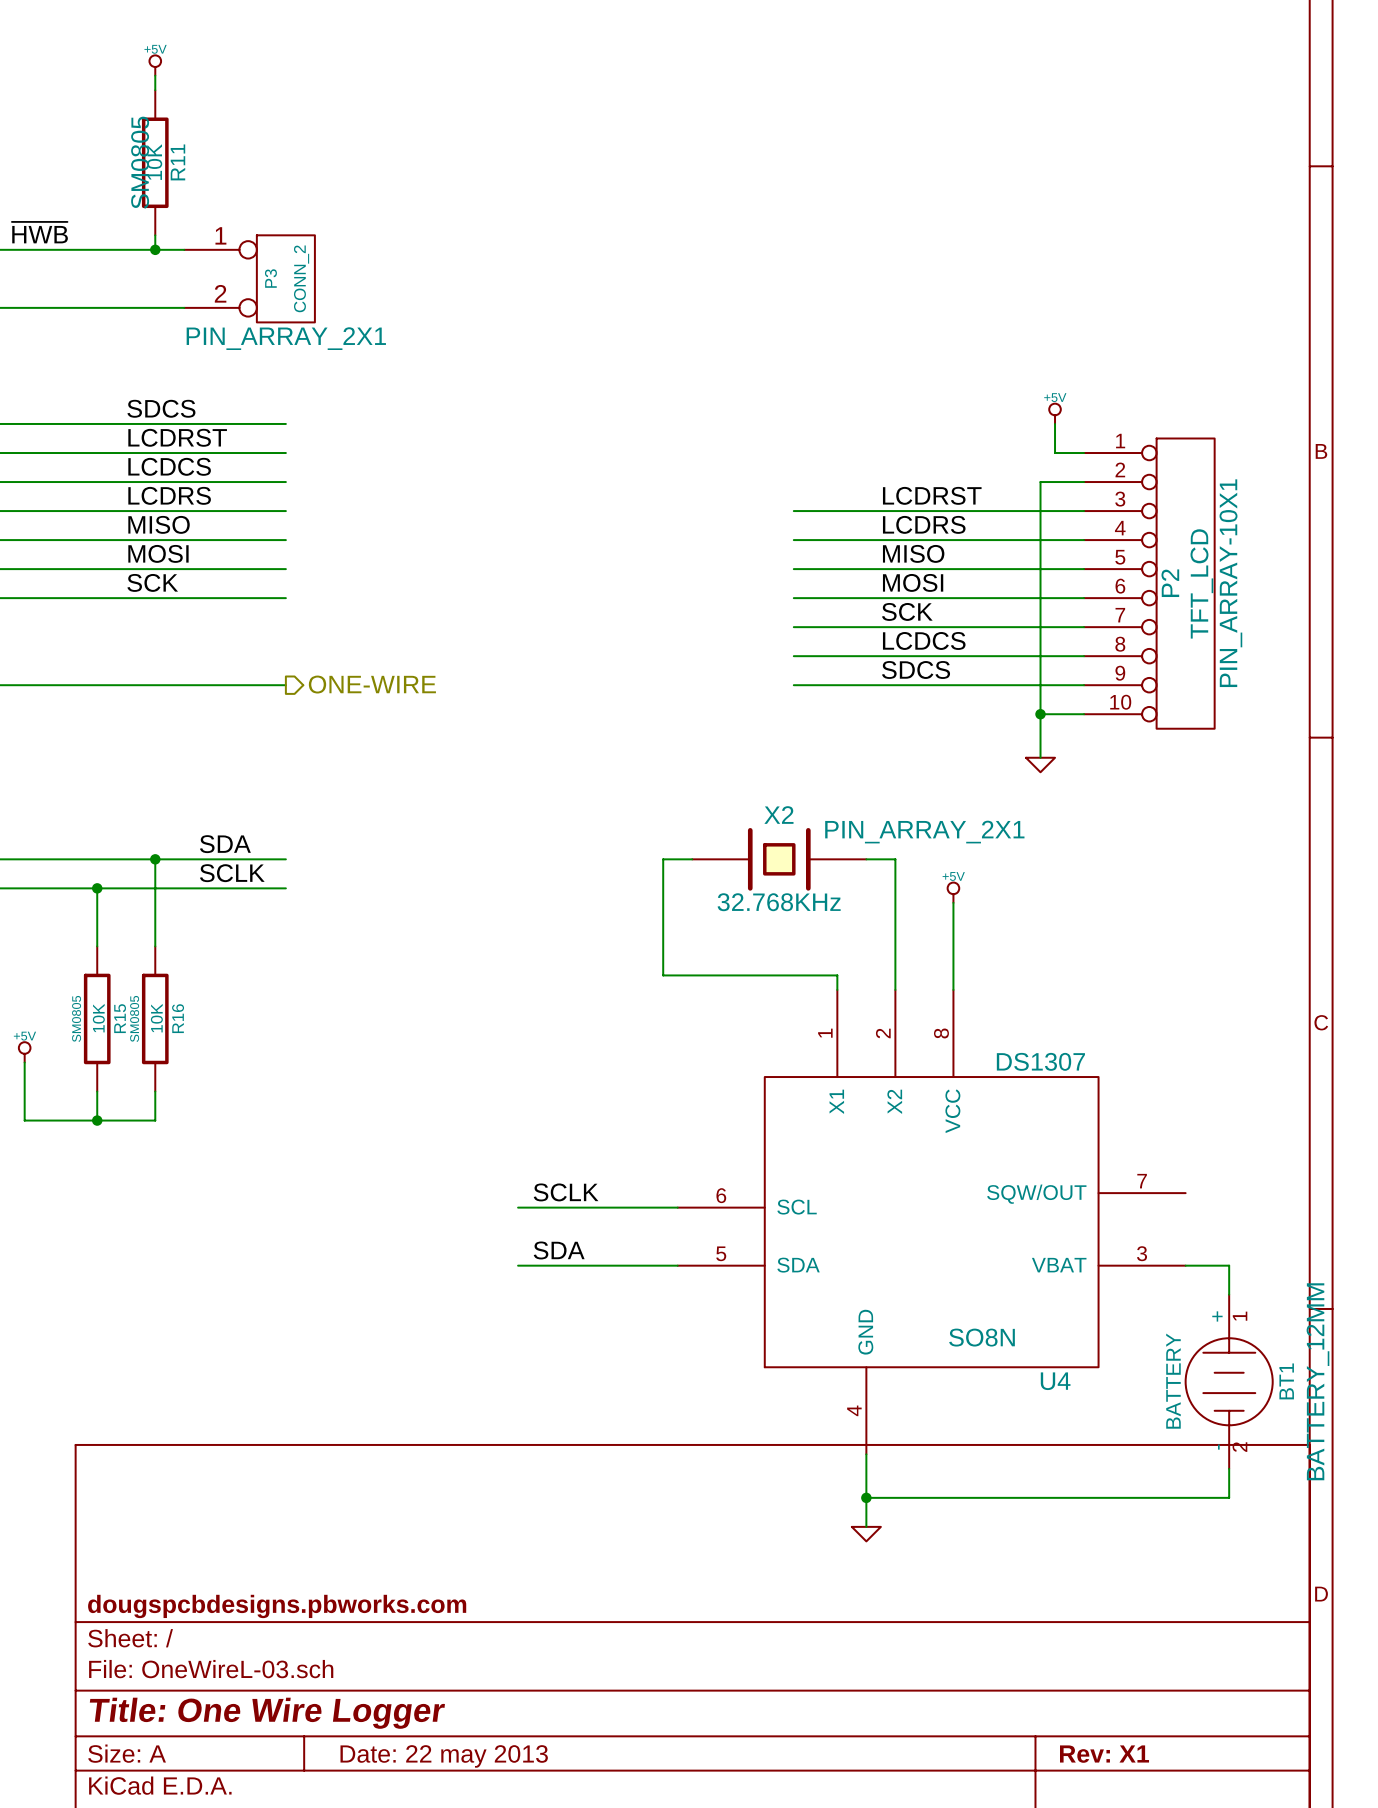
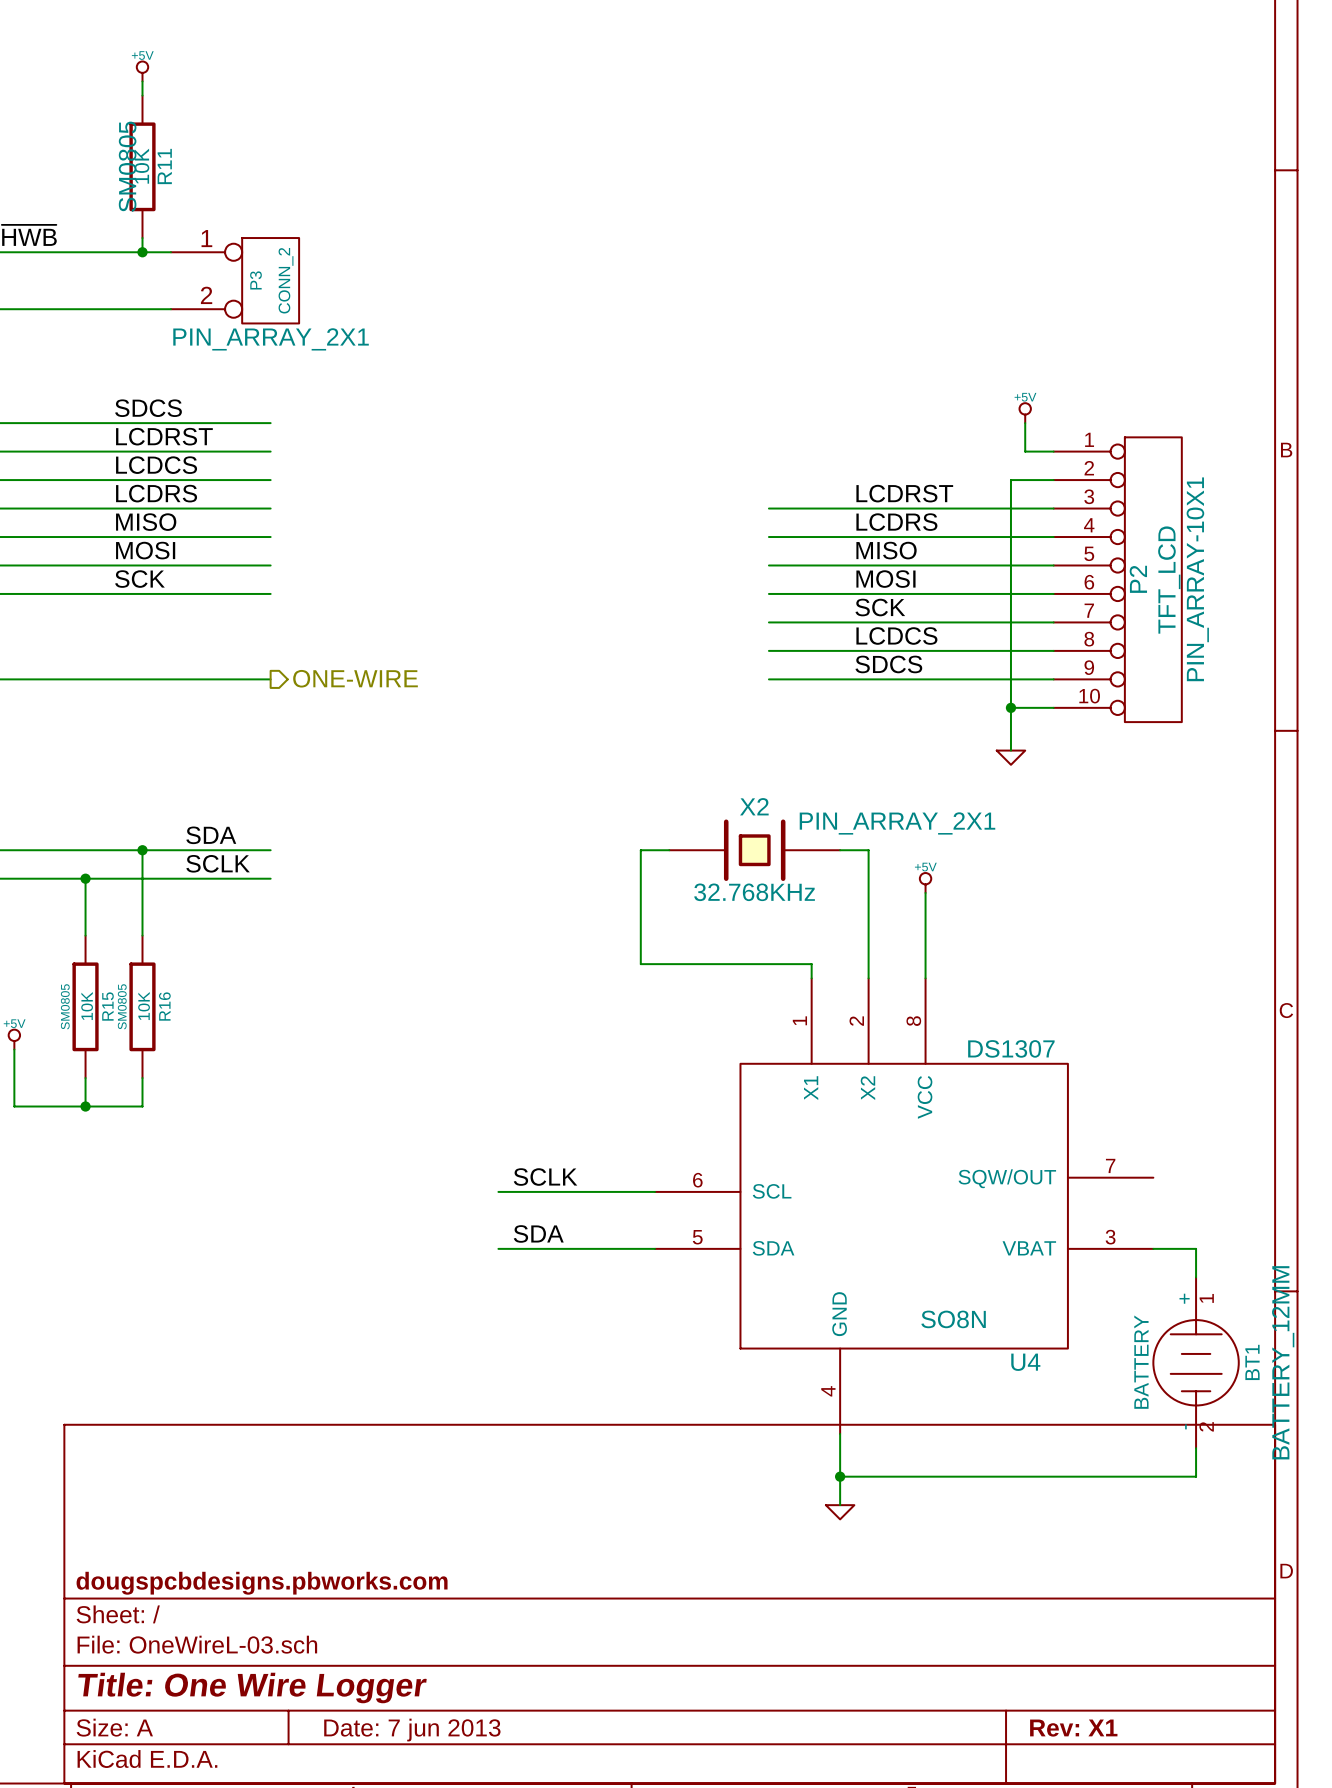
title block: Date: 22 may 2013 (444, 1756) -> Date: 7 jun 2013 (412, 1730)

